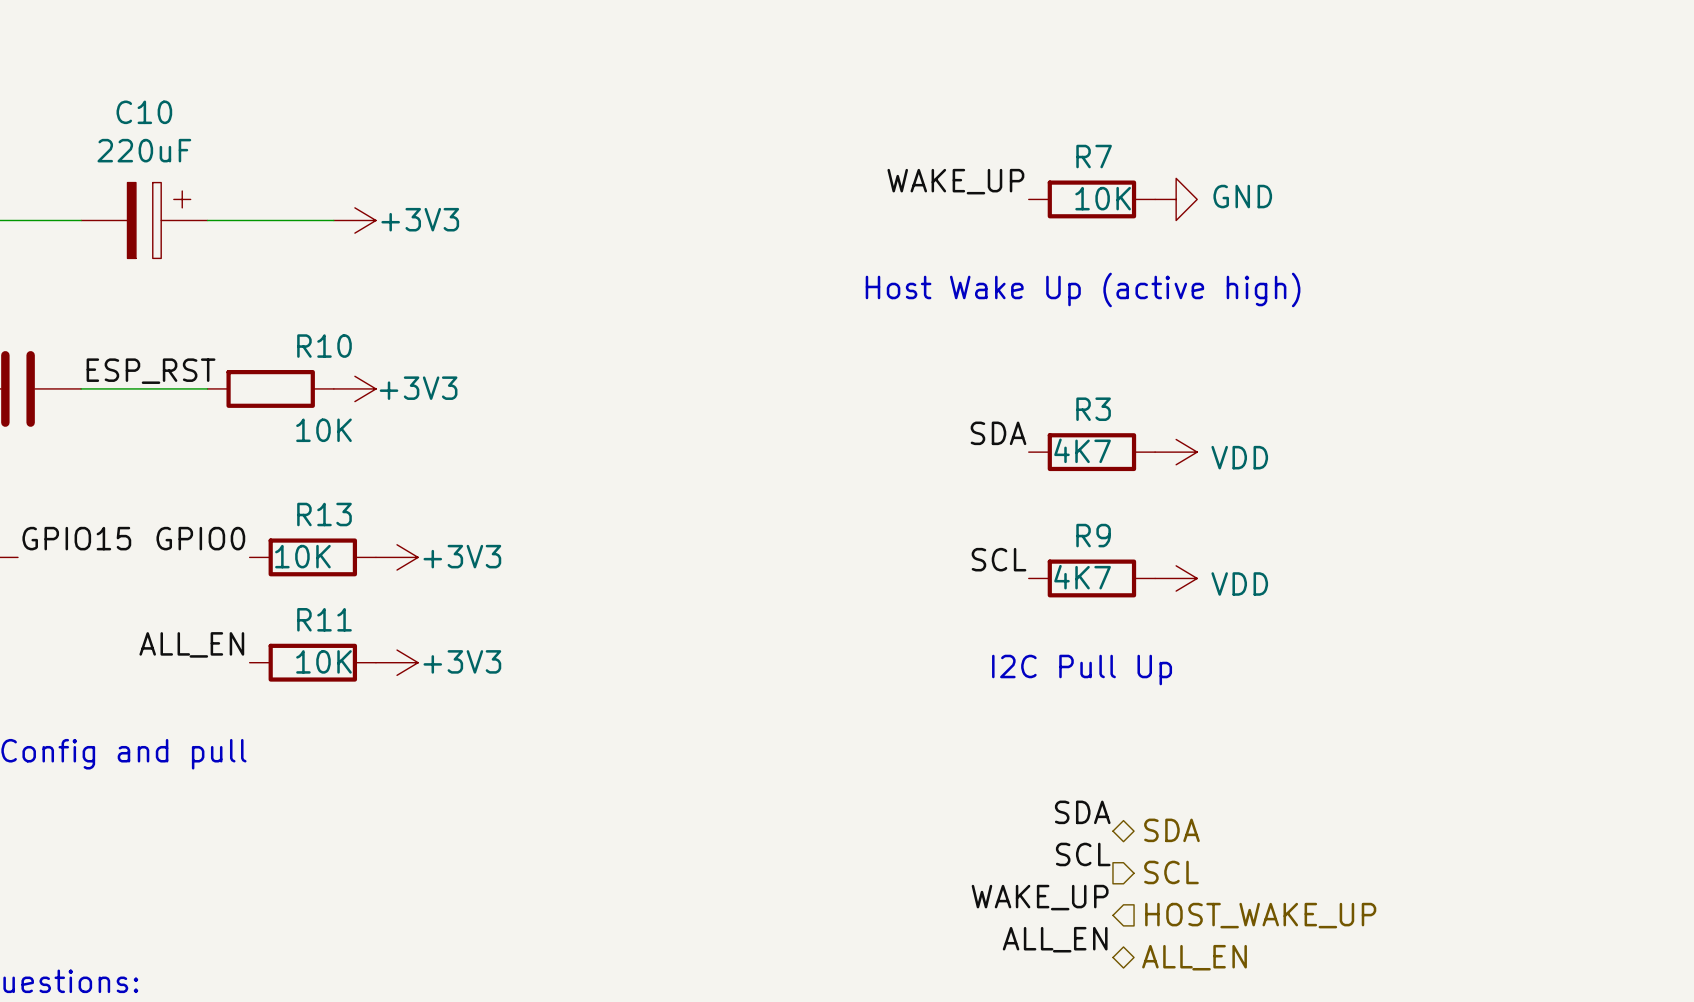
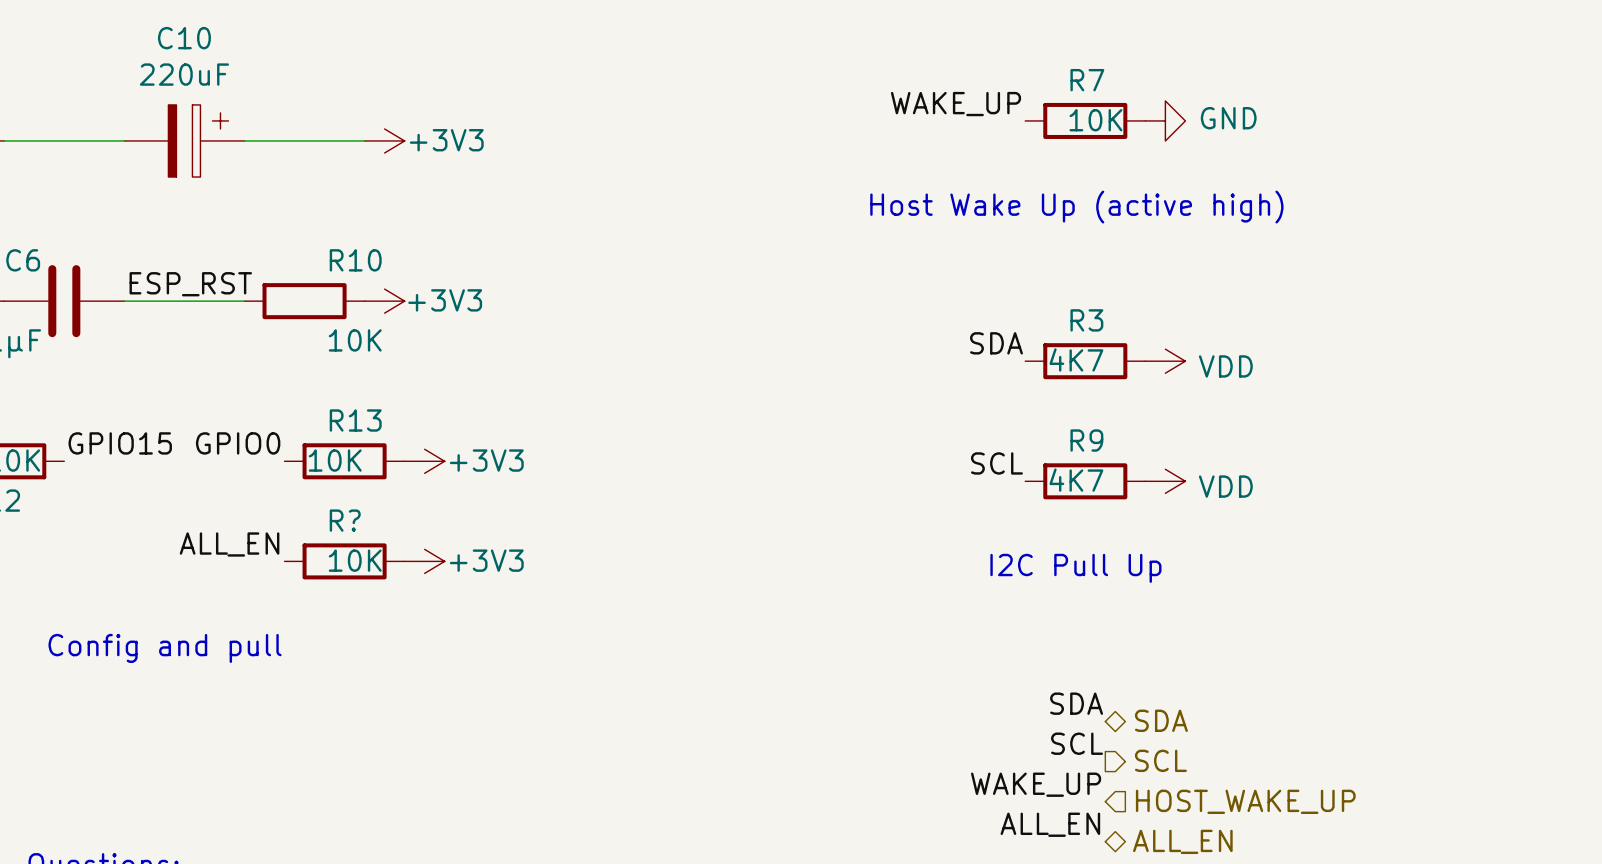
R11 name: R11 (324, 619) -> R? (345, 520)

